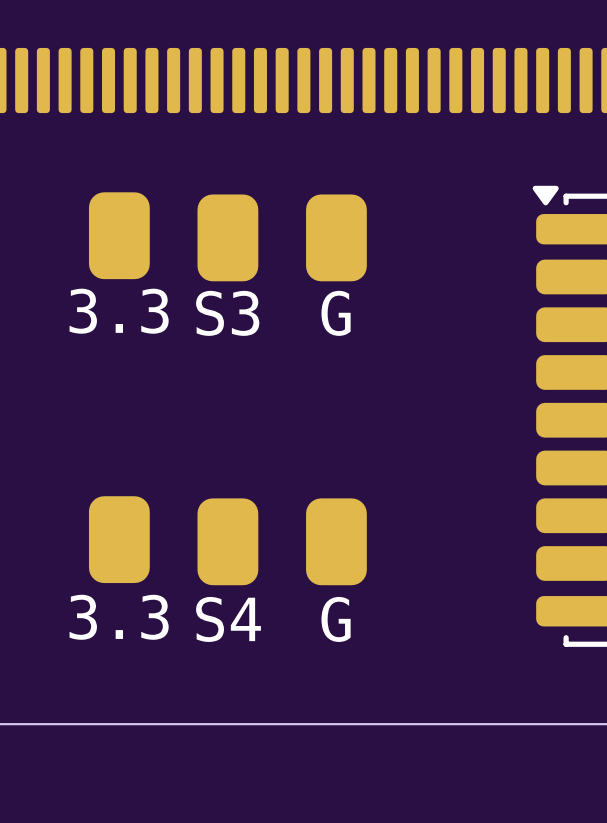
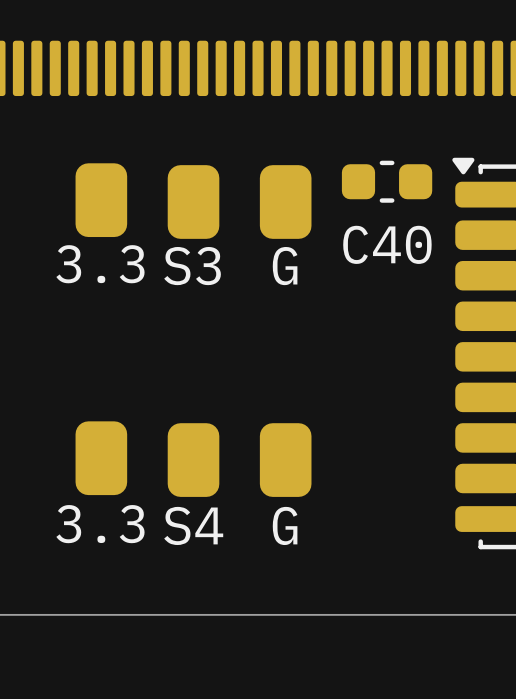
C40: none -> (387, 181)

